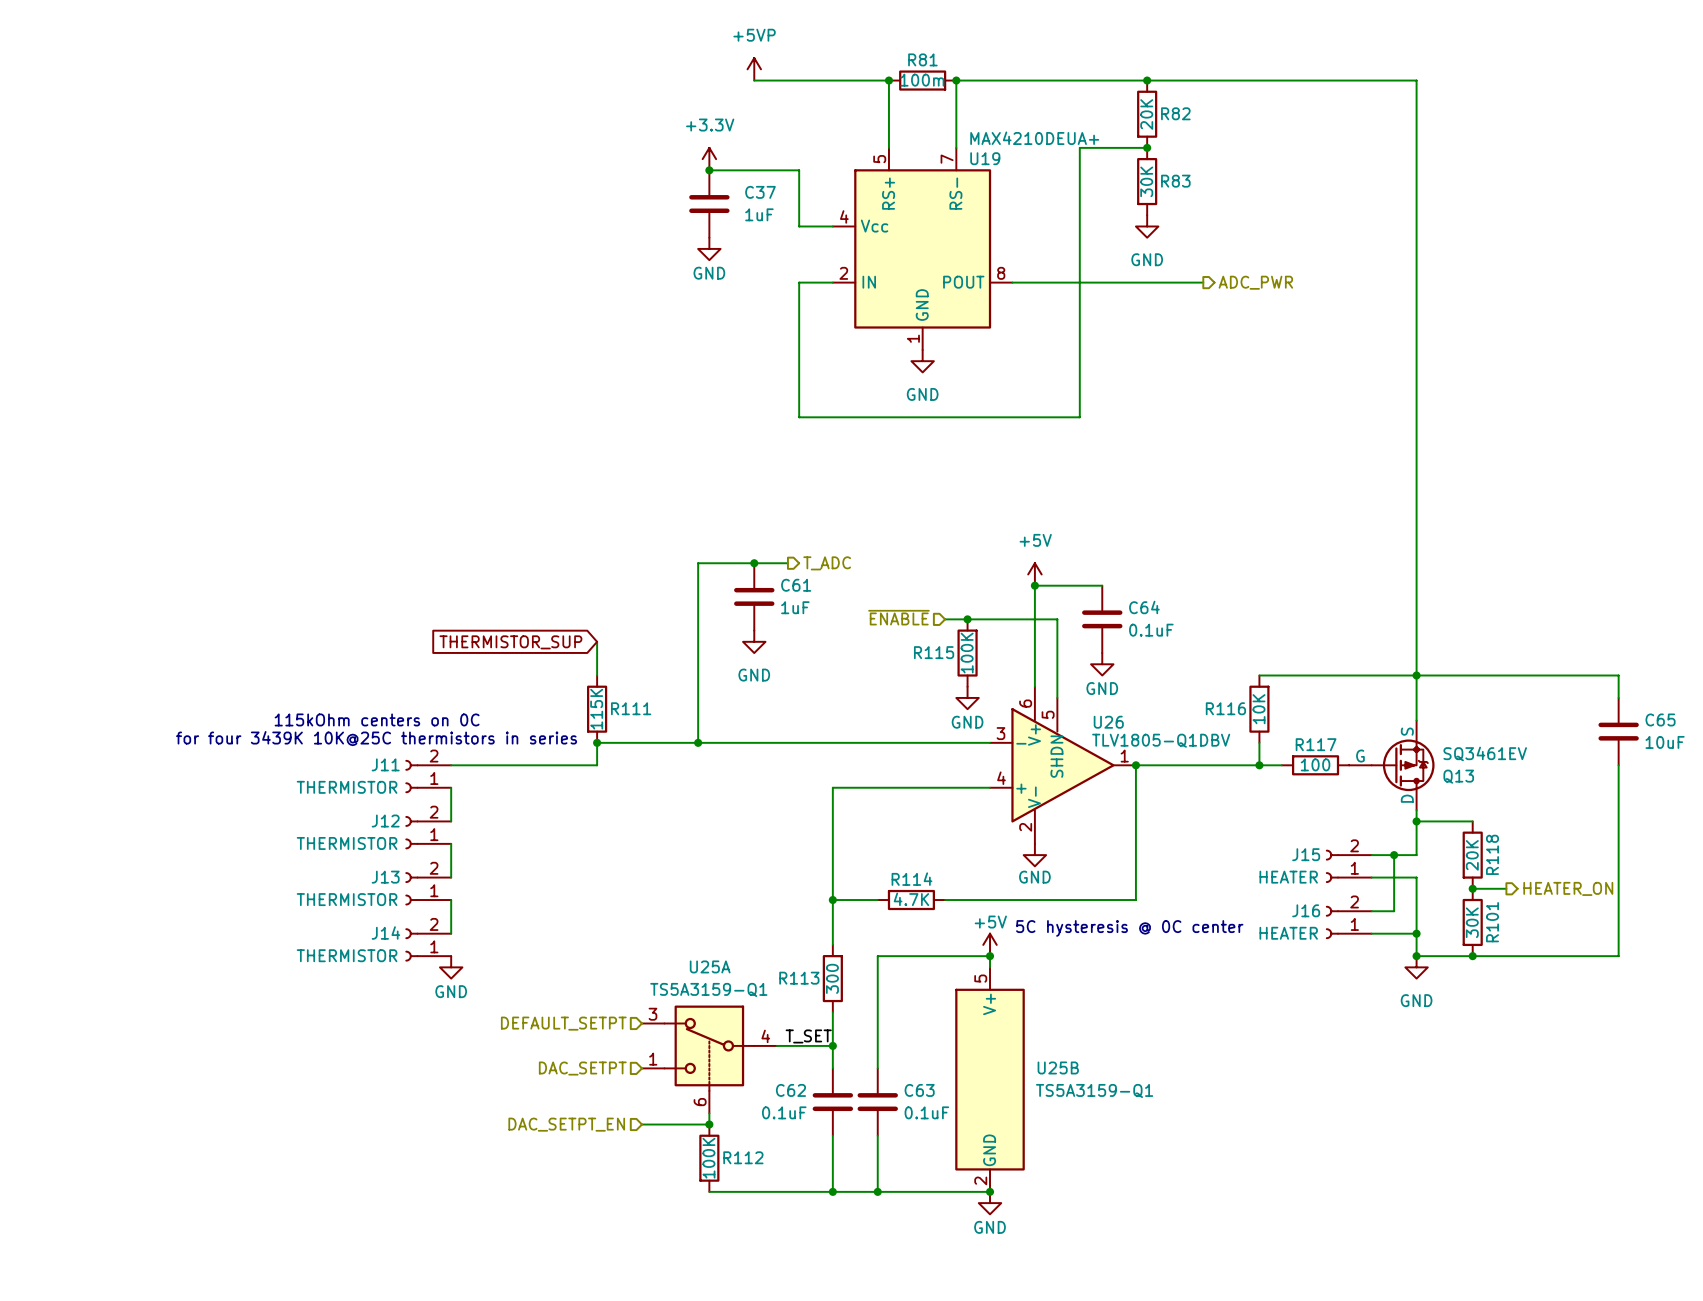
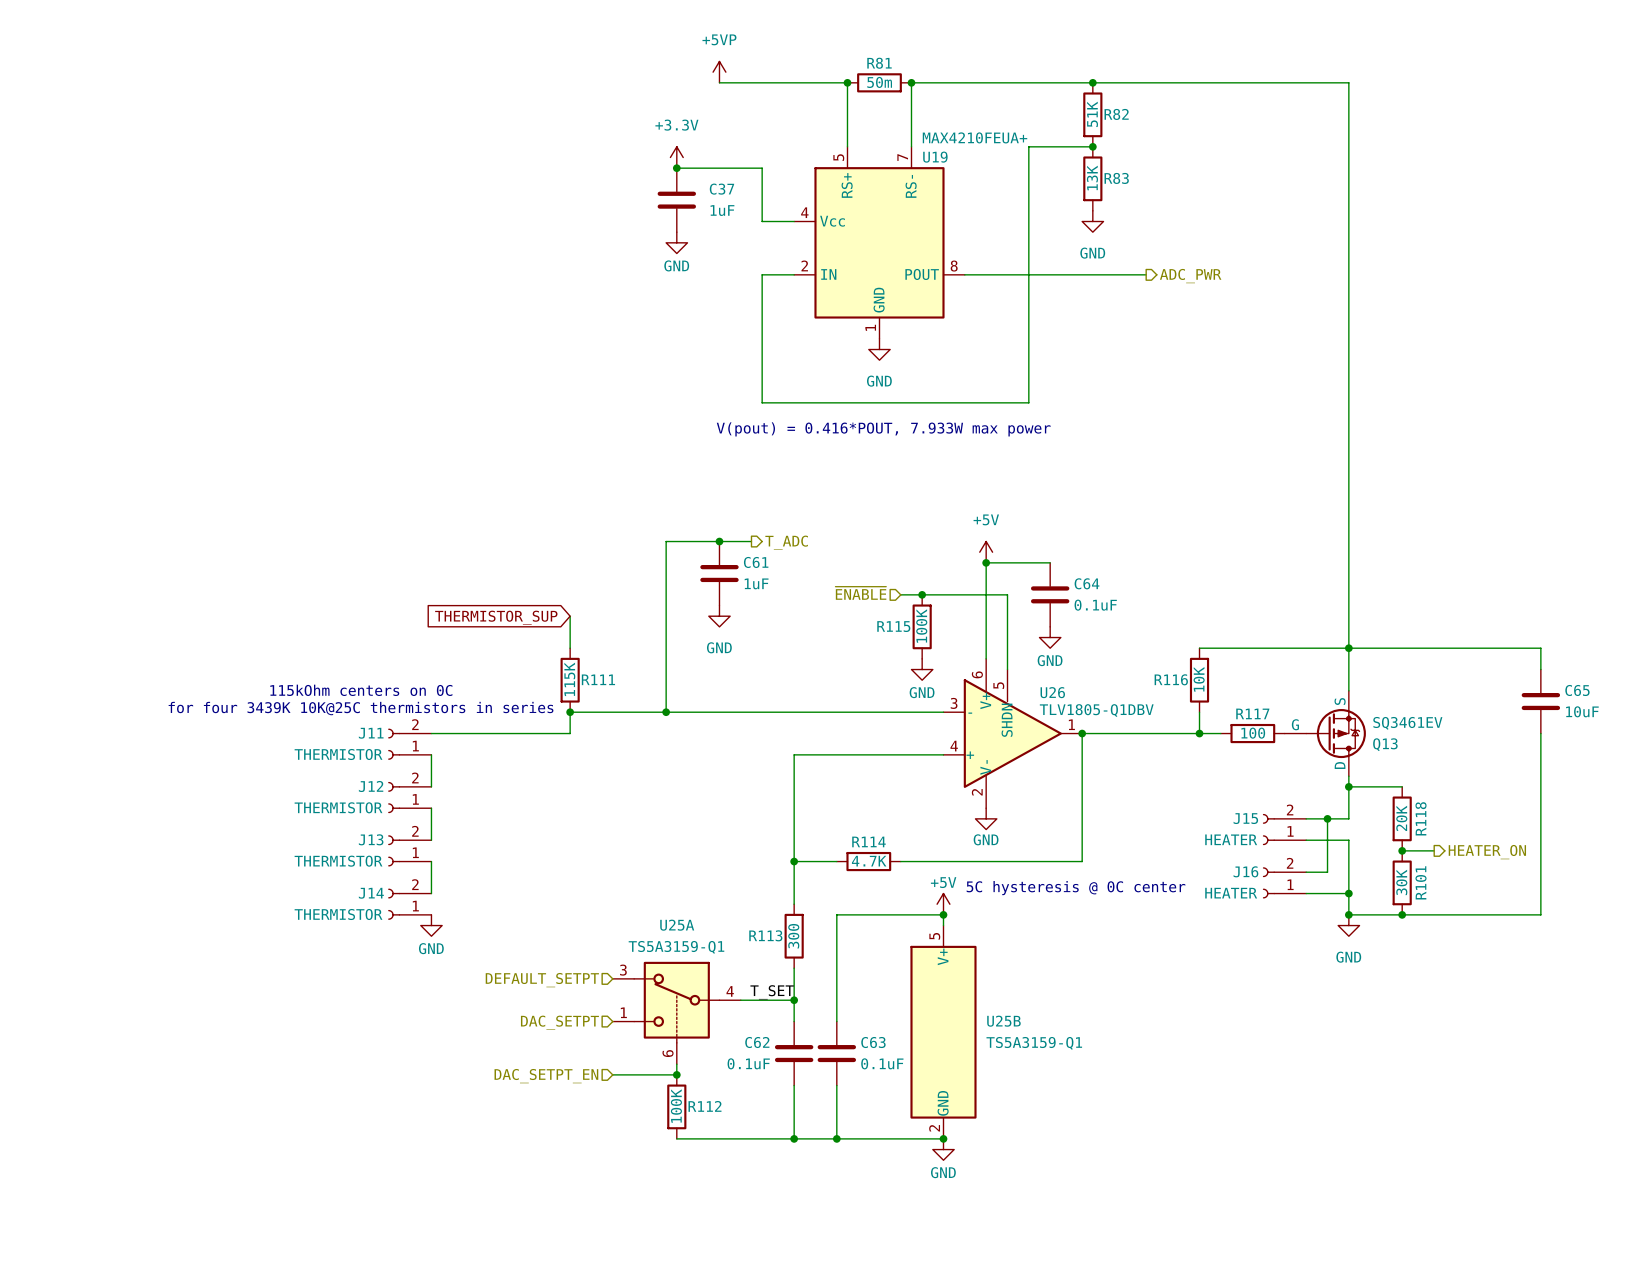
R81 value: 100m (922, 80) -> 50m (879, 82)
R82 value: 20K (1146, 114) -> 51K (1092, 114)
U19 value: MAX4210DEUA+ (1034, 138) -> MAX4210FEUA+ (975, 137)
R83 value: 30K (1146, 181) -> 13K (1092, 177)
text: none -> V(pout) = 0.416*POUT, 7.933W max power (883, 429)

